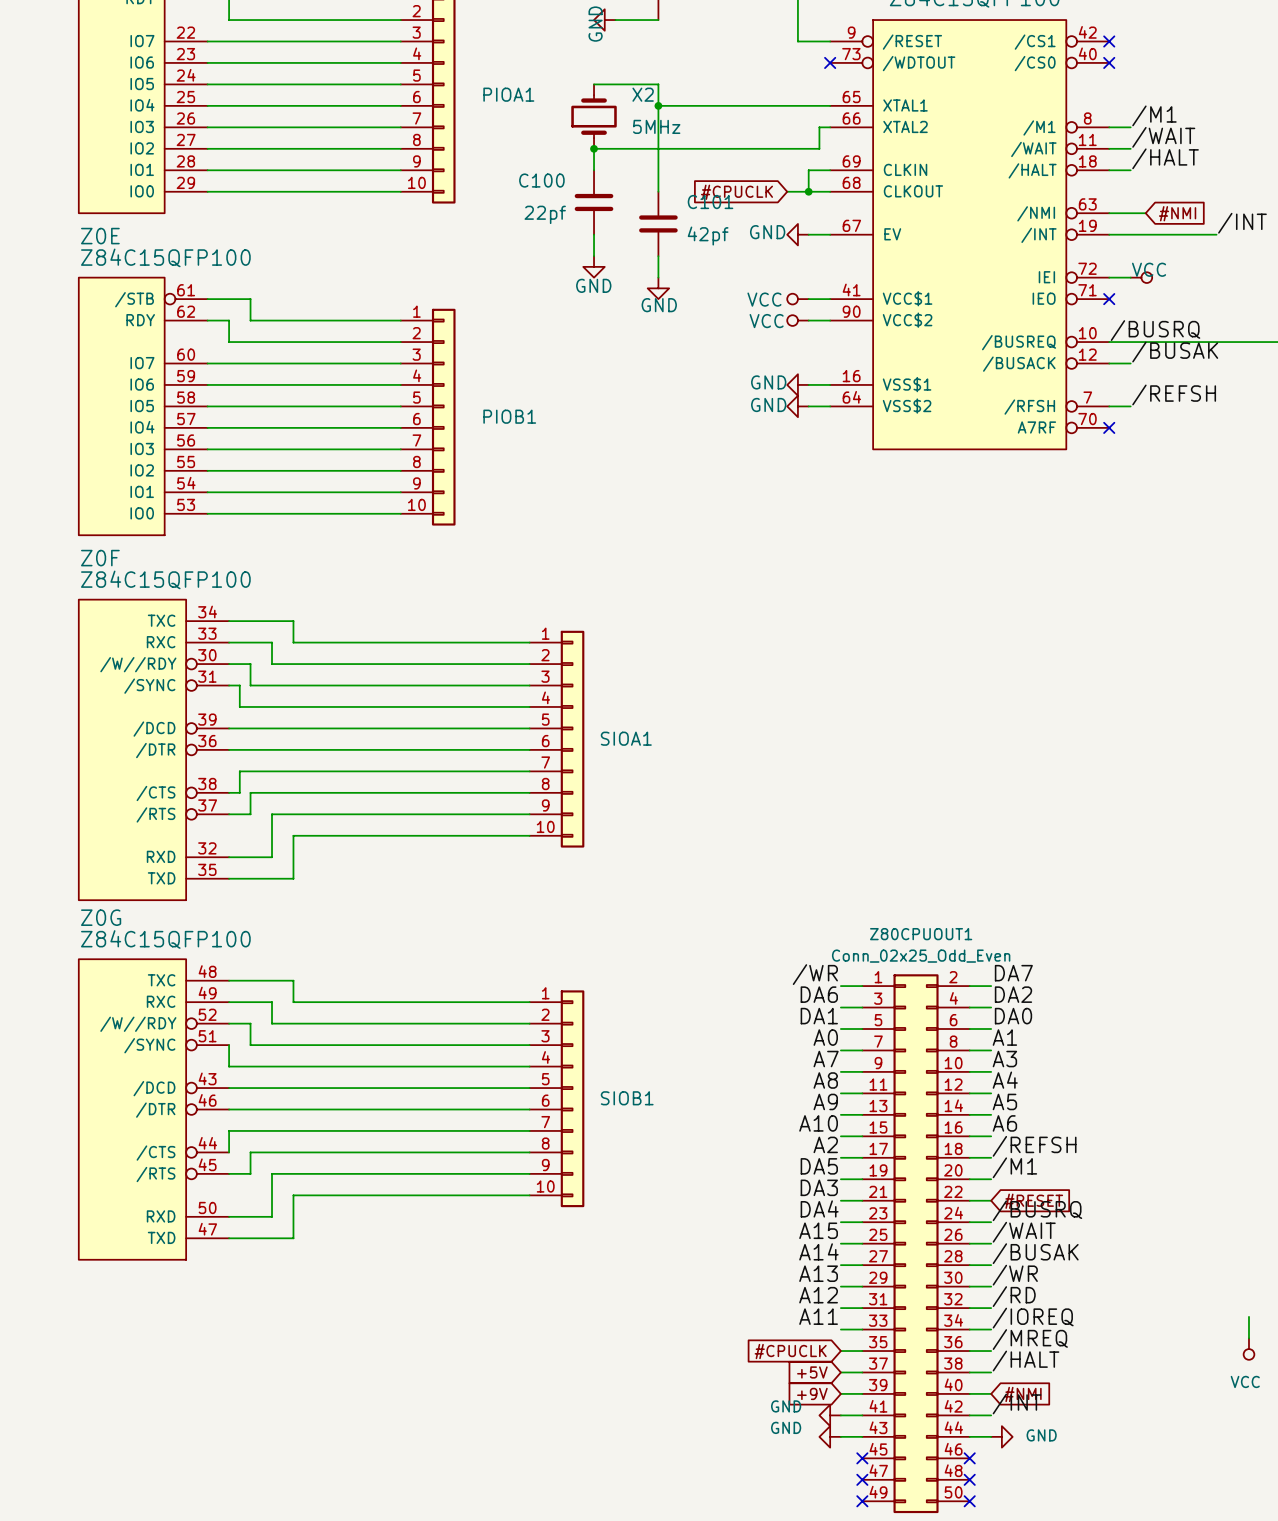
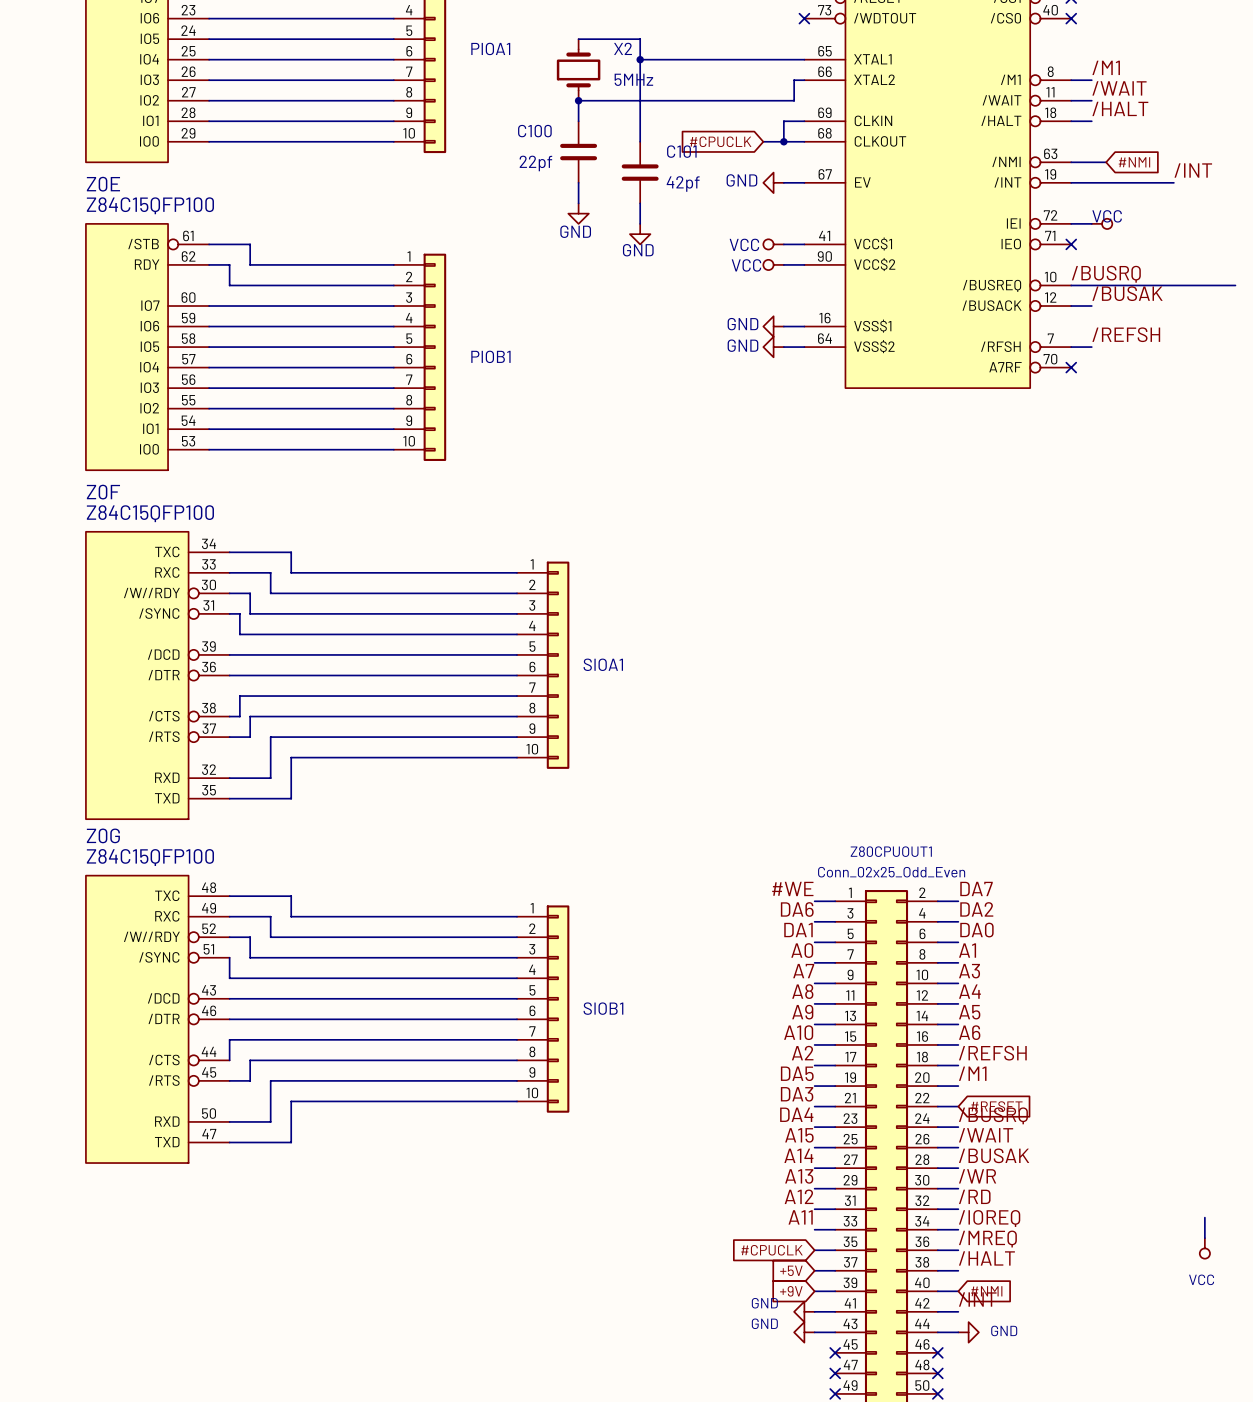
label: /WR (815, 974) -> #WE (792, 888)

